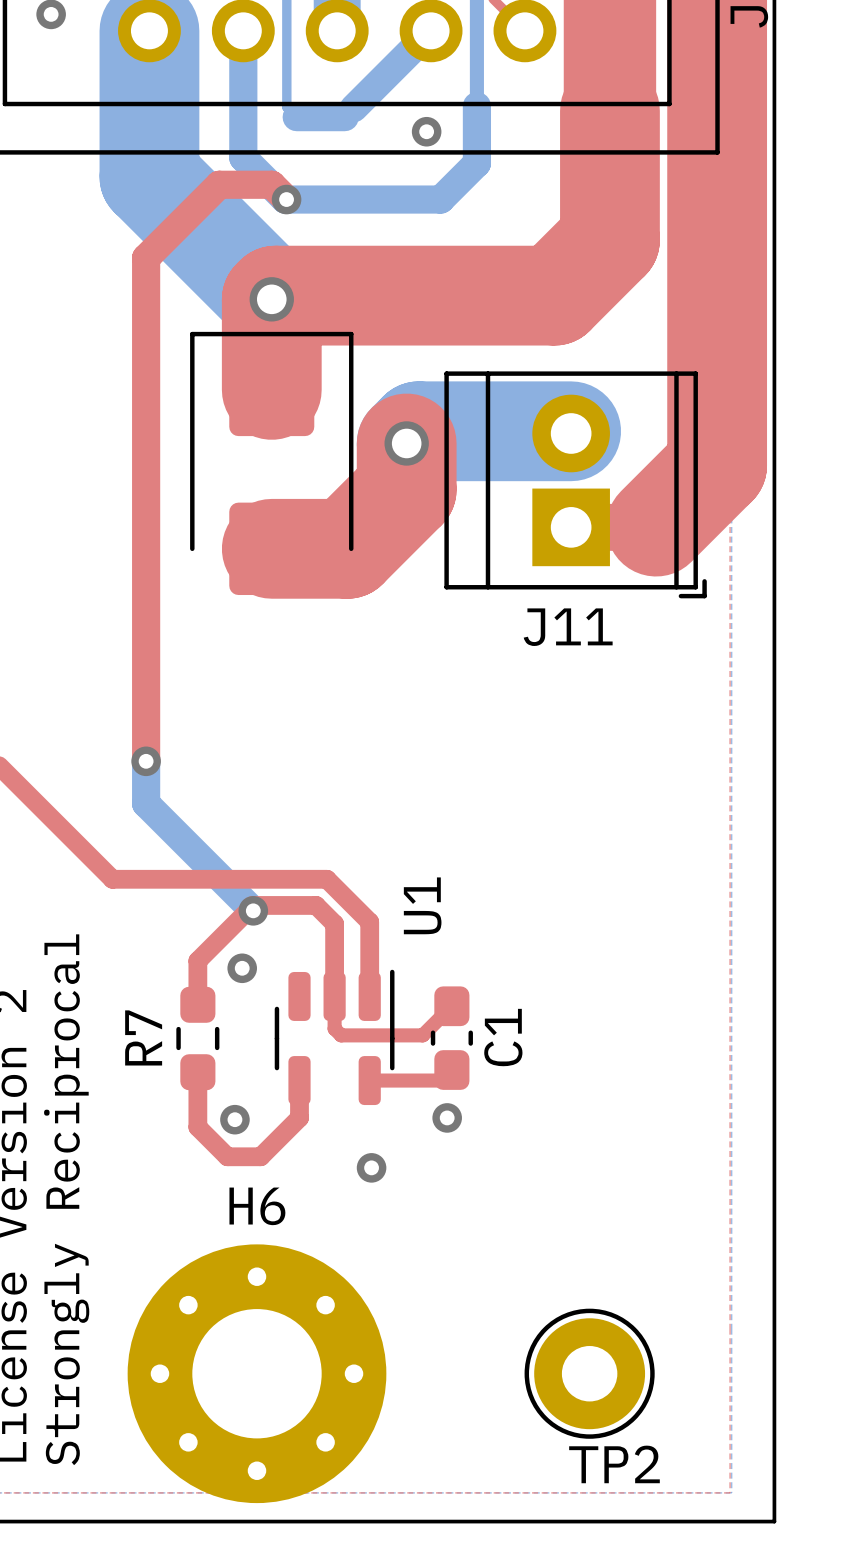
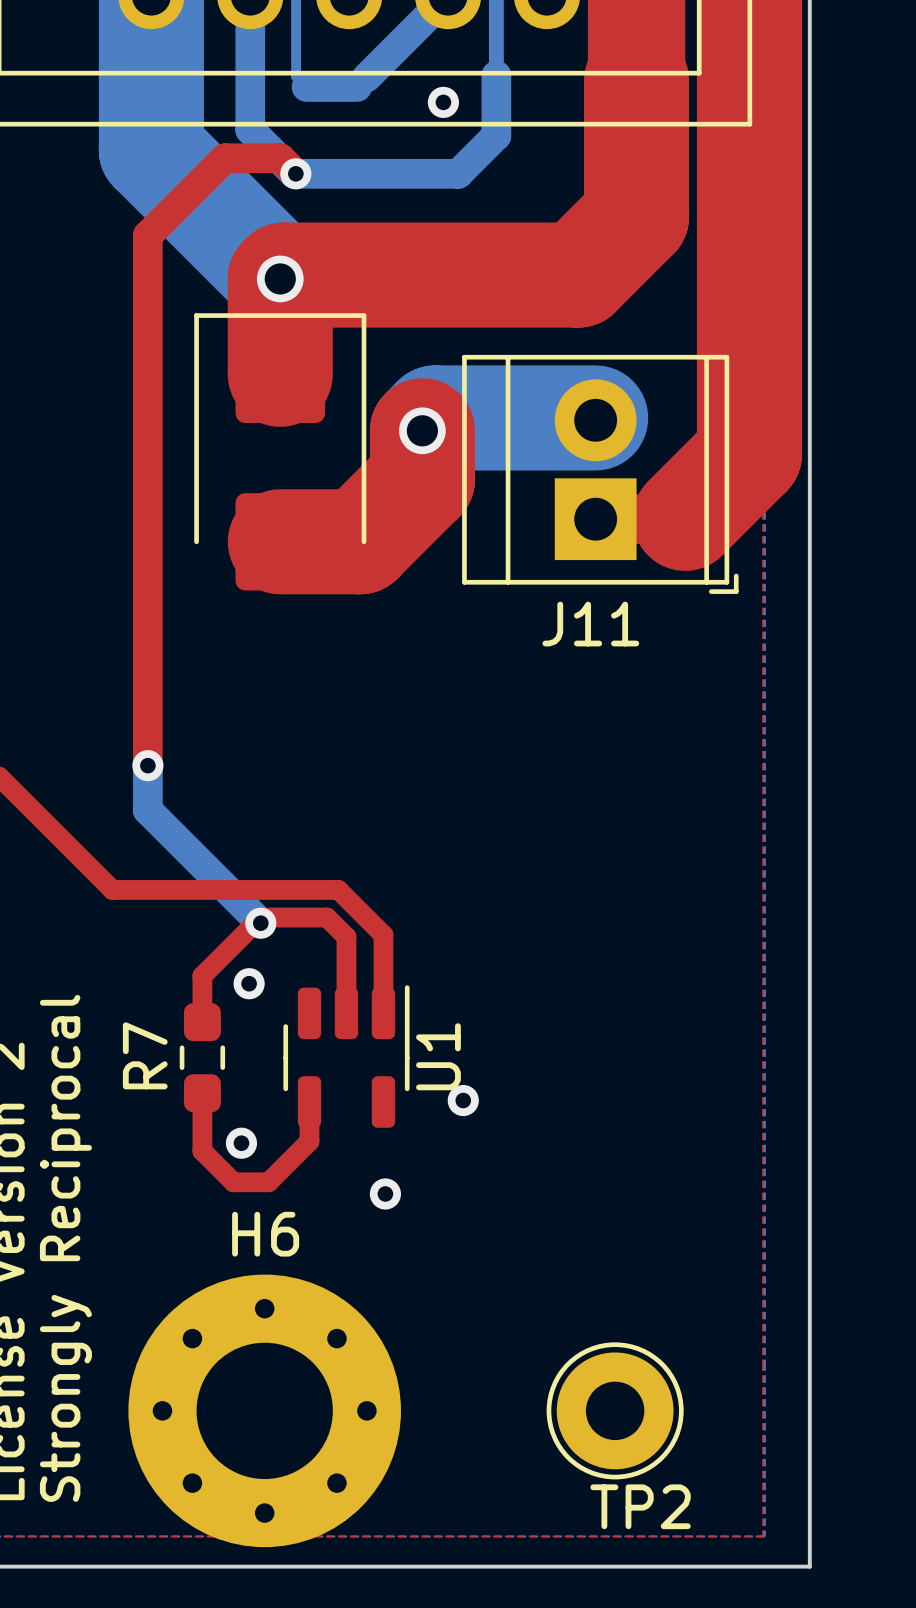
U1 name position: U1 (422, 905) -> U1 (438, 1056)
top track: (334, 996) (334, 1028) (341, 1035) (422, 1035) (451, 1006) -> none
C1: (451, 1038) -> none
top track: (451, 1070) (441, 1080) (369, 1080) -> none
via position: (447, 1117) -> (463, 1100)

